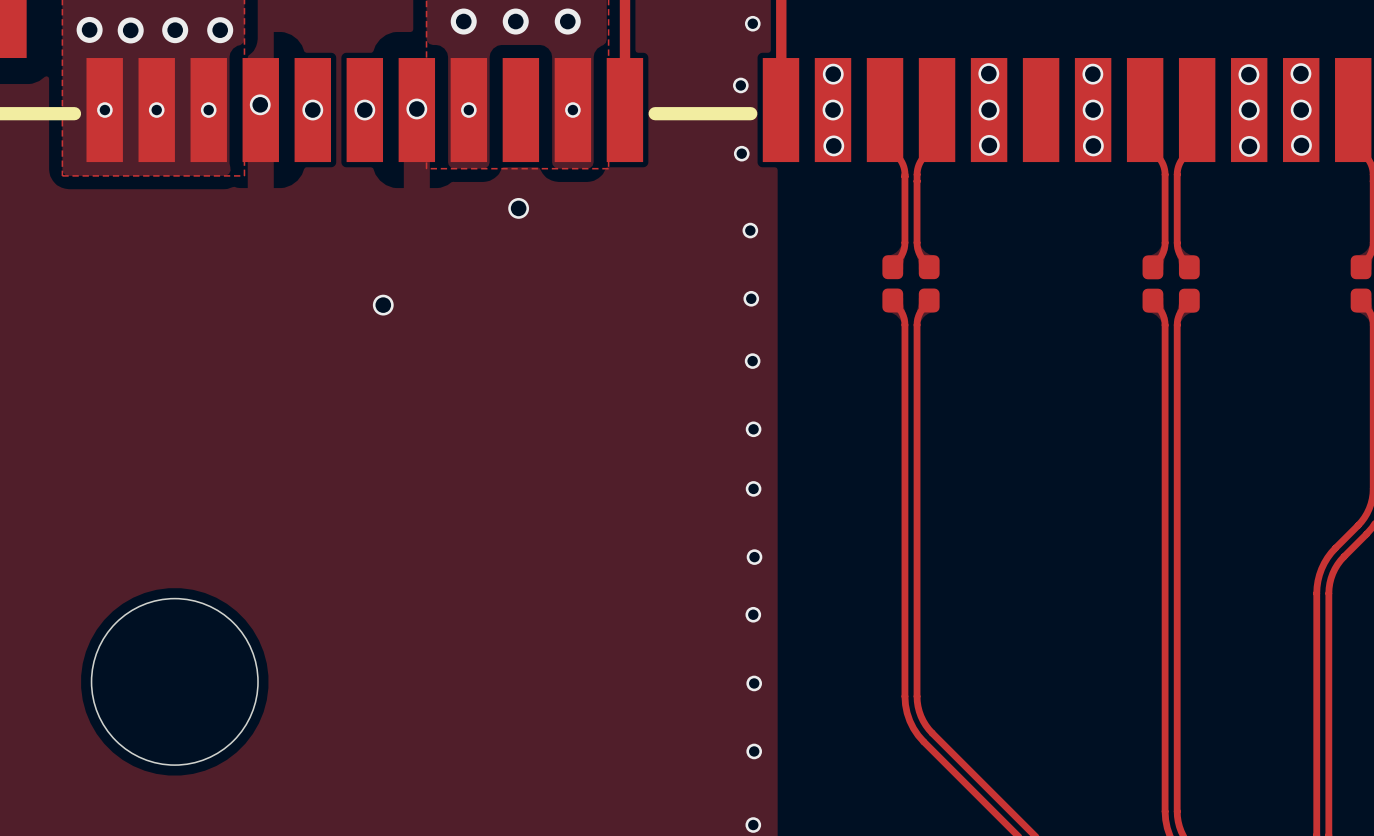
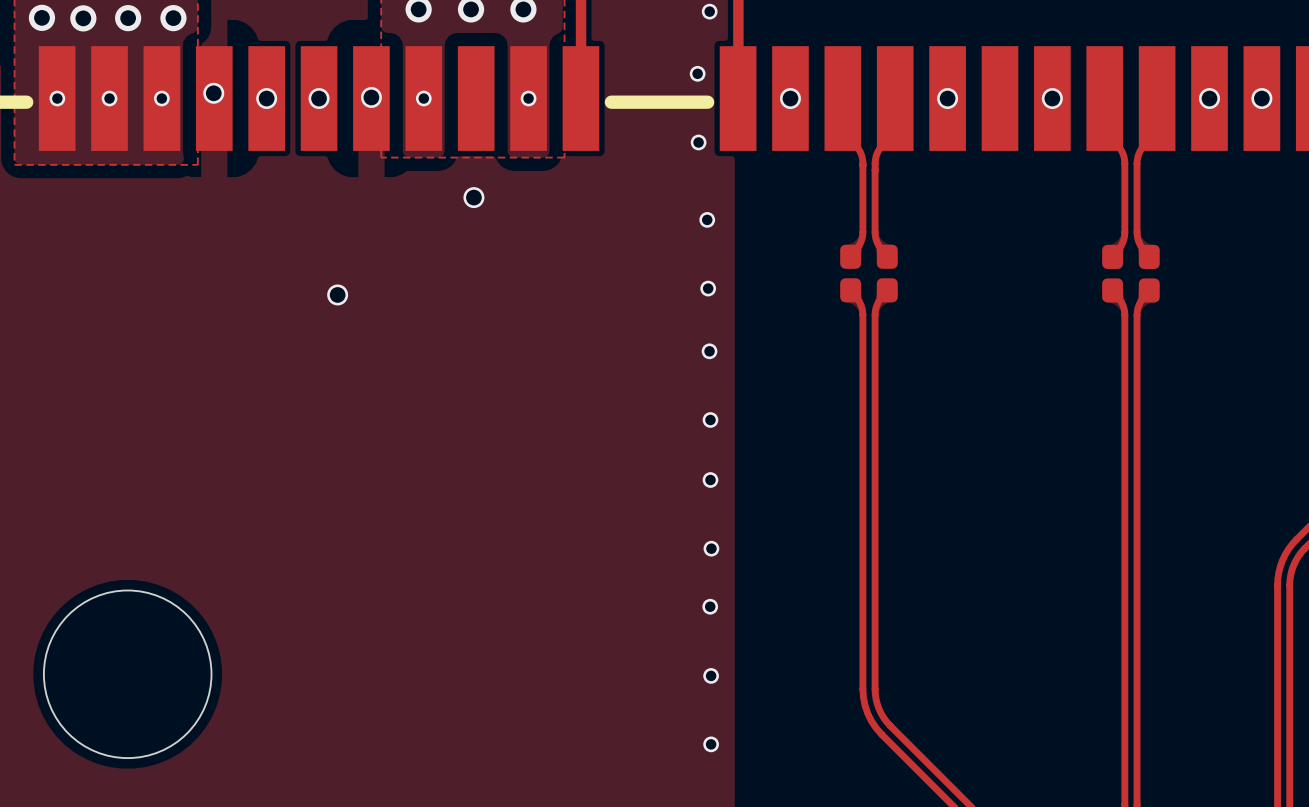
via: (988, 73) -> none
via: (1300, 73) -> none
via: (833, 74) -> none
via: (1092, 74) -> none
via: (1248, 74) -> none
via: (833, 145) -> none
via: (989, 145) -> none
via: (1093, 145) -> none
via: (1301, 145) -> none
via: (1249, 146) -> none

